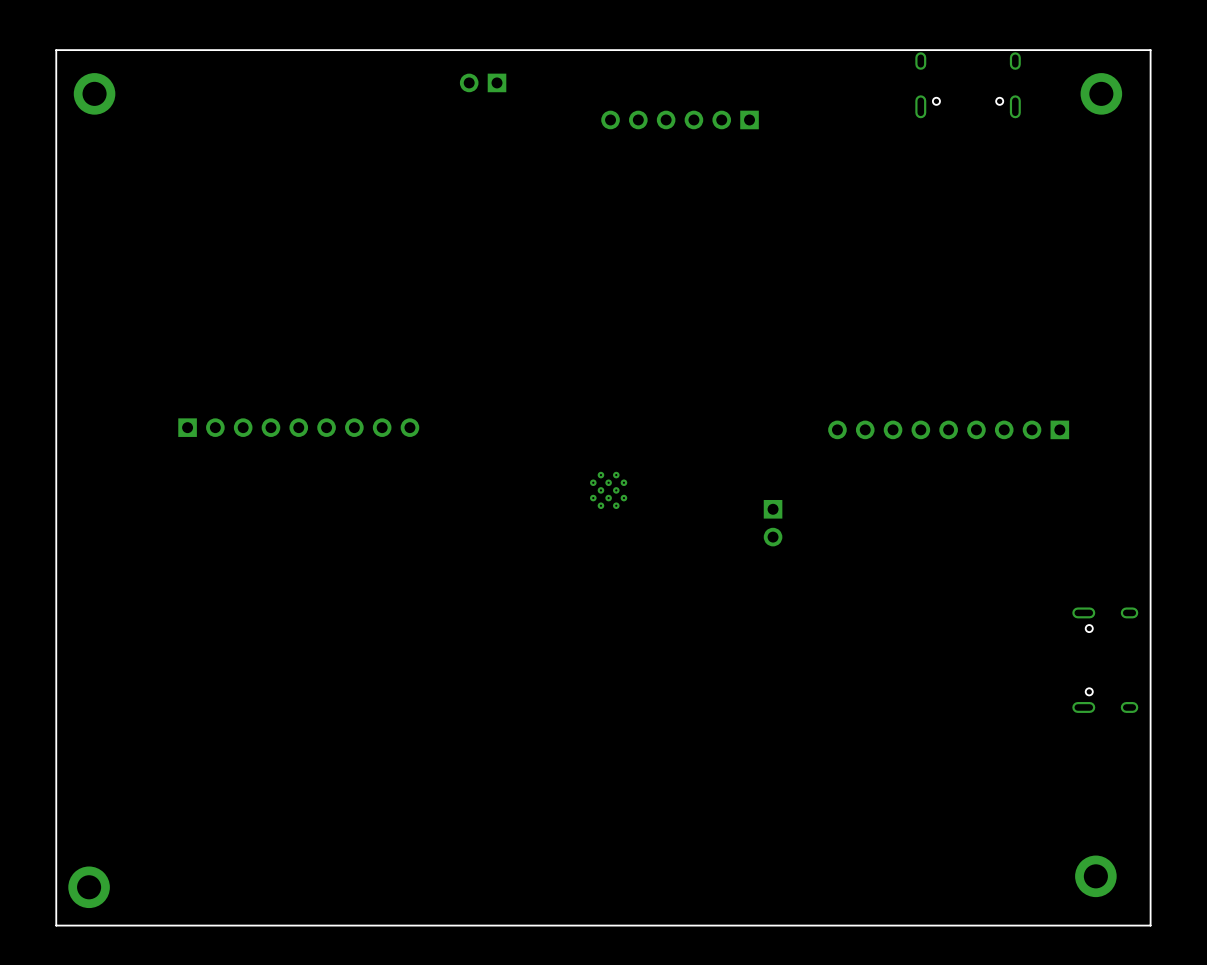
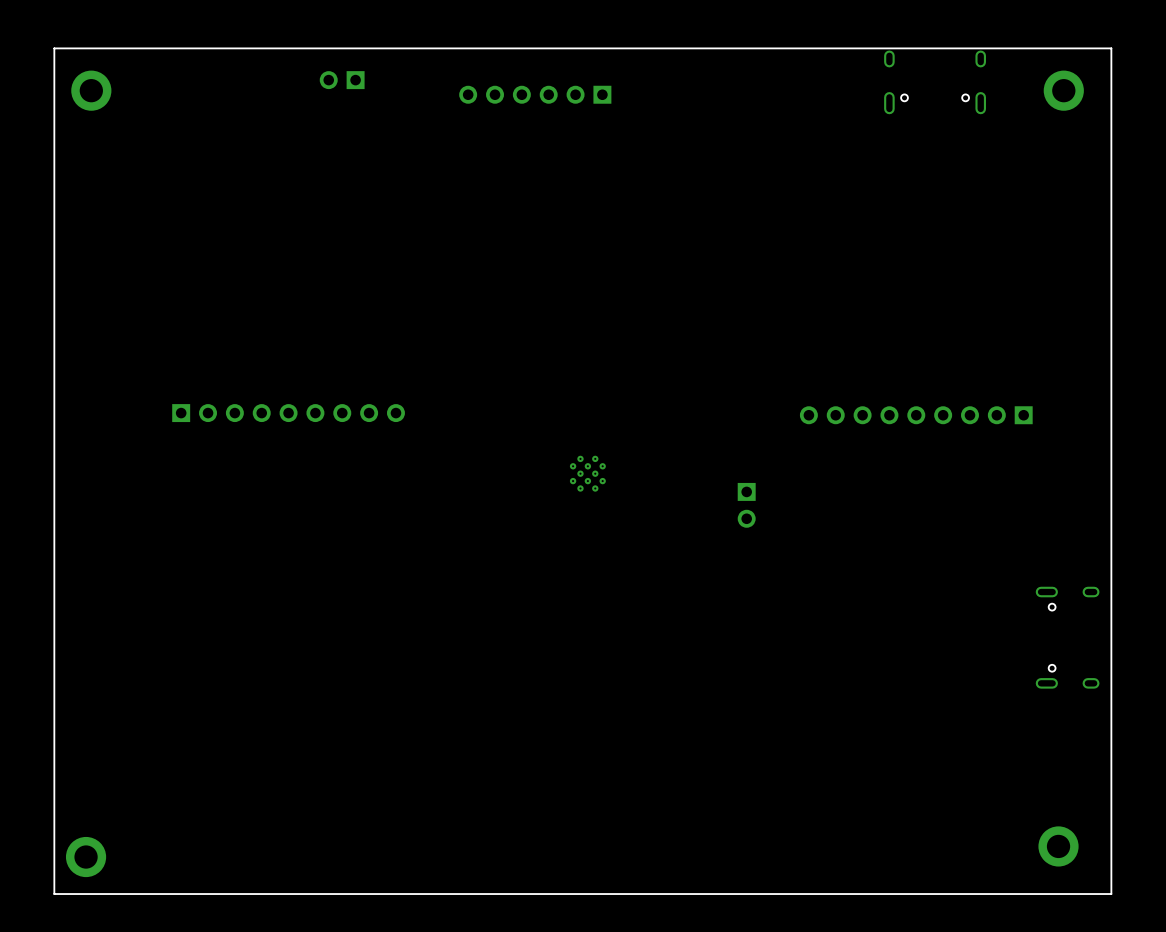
part position: (483, 82) -> (342, 80)
part position: (680, 119) -> (535, 94)

